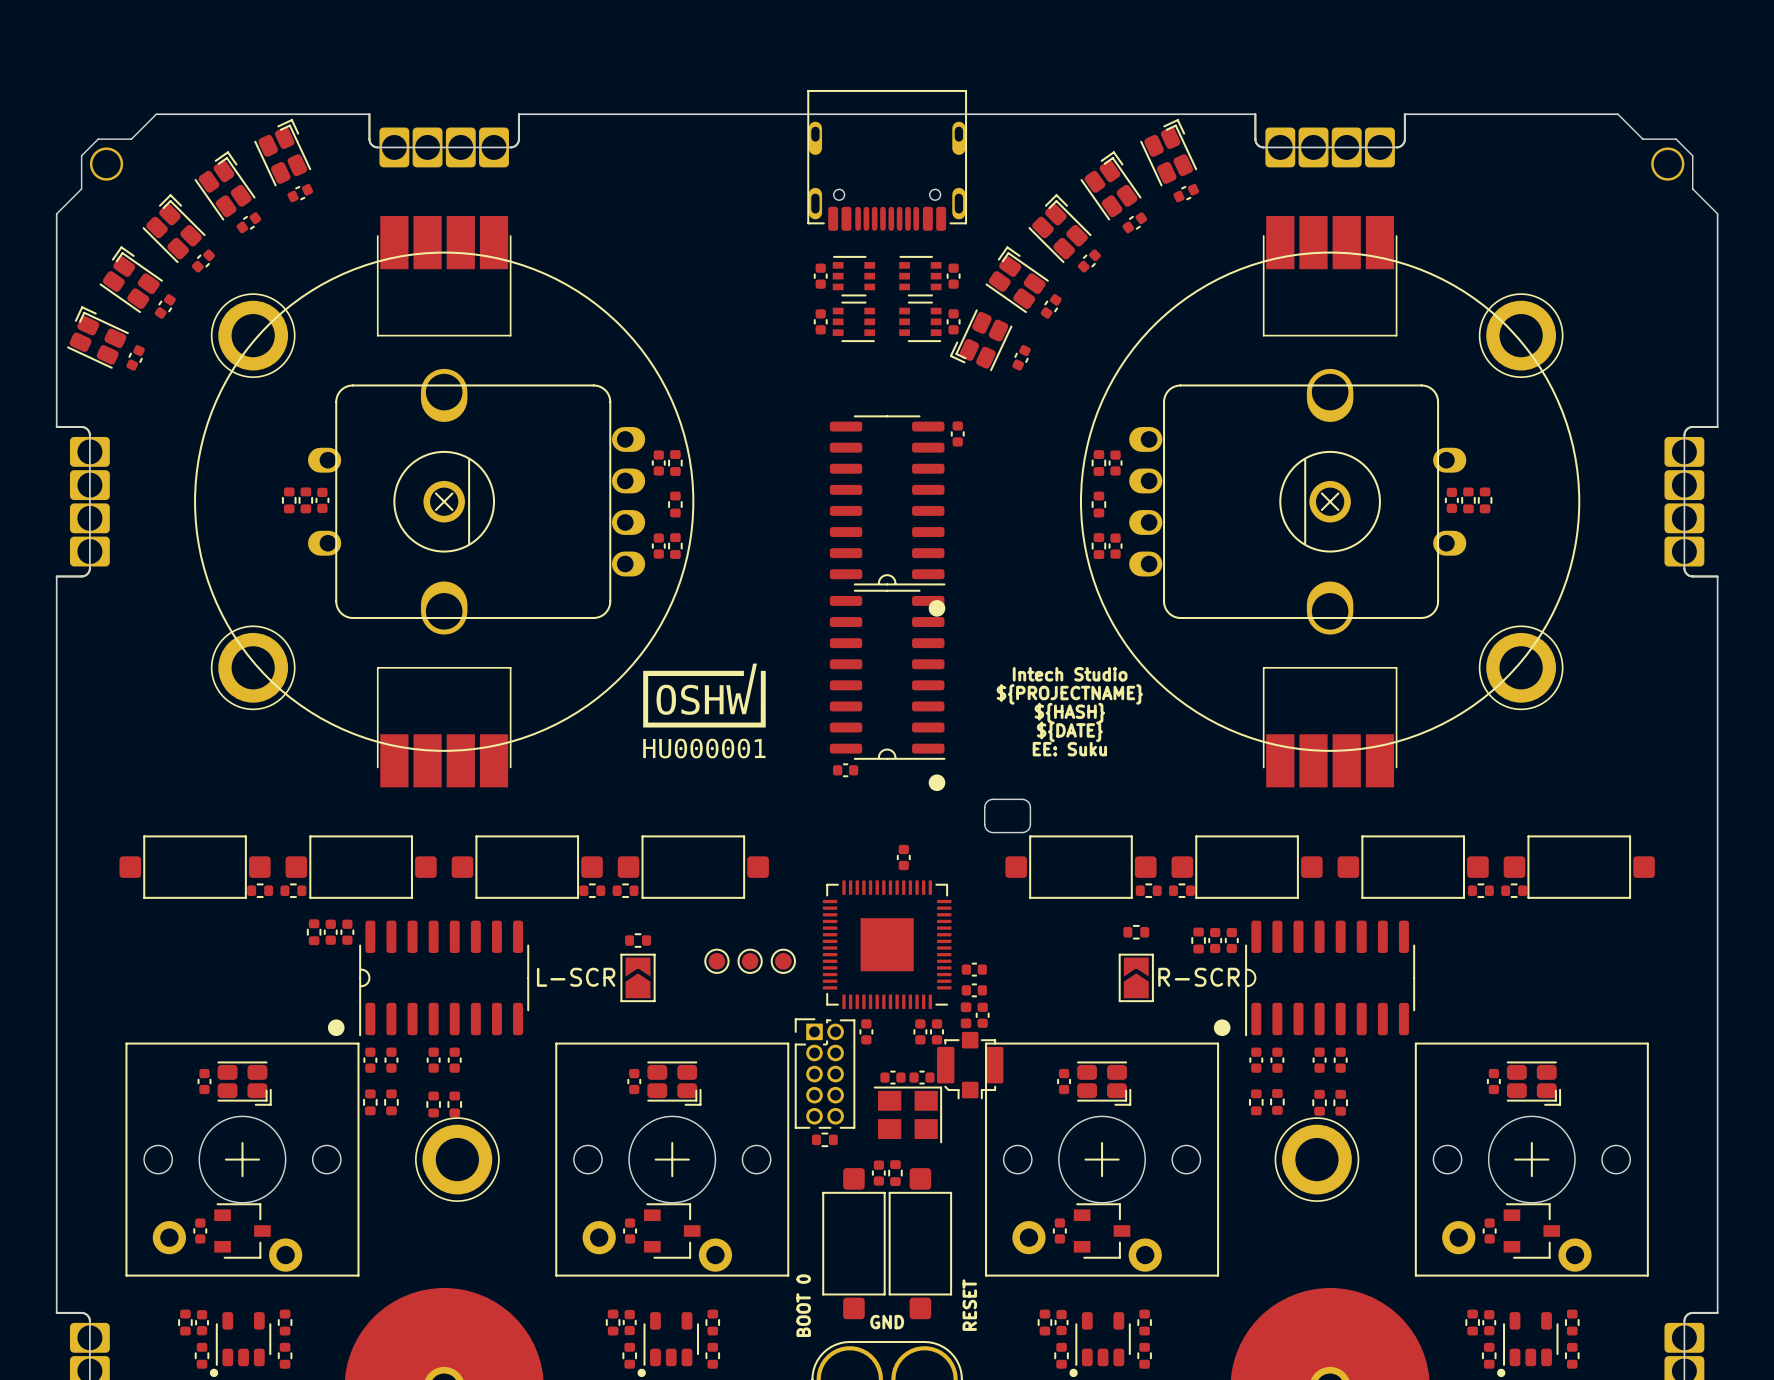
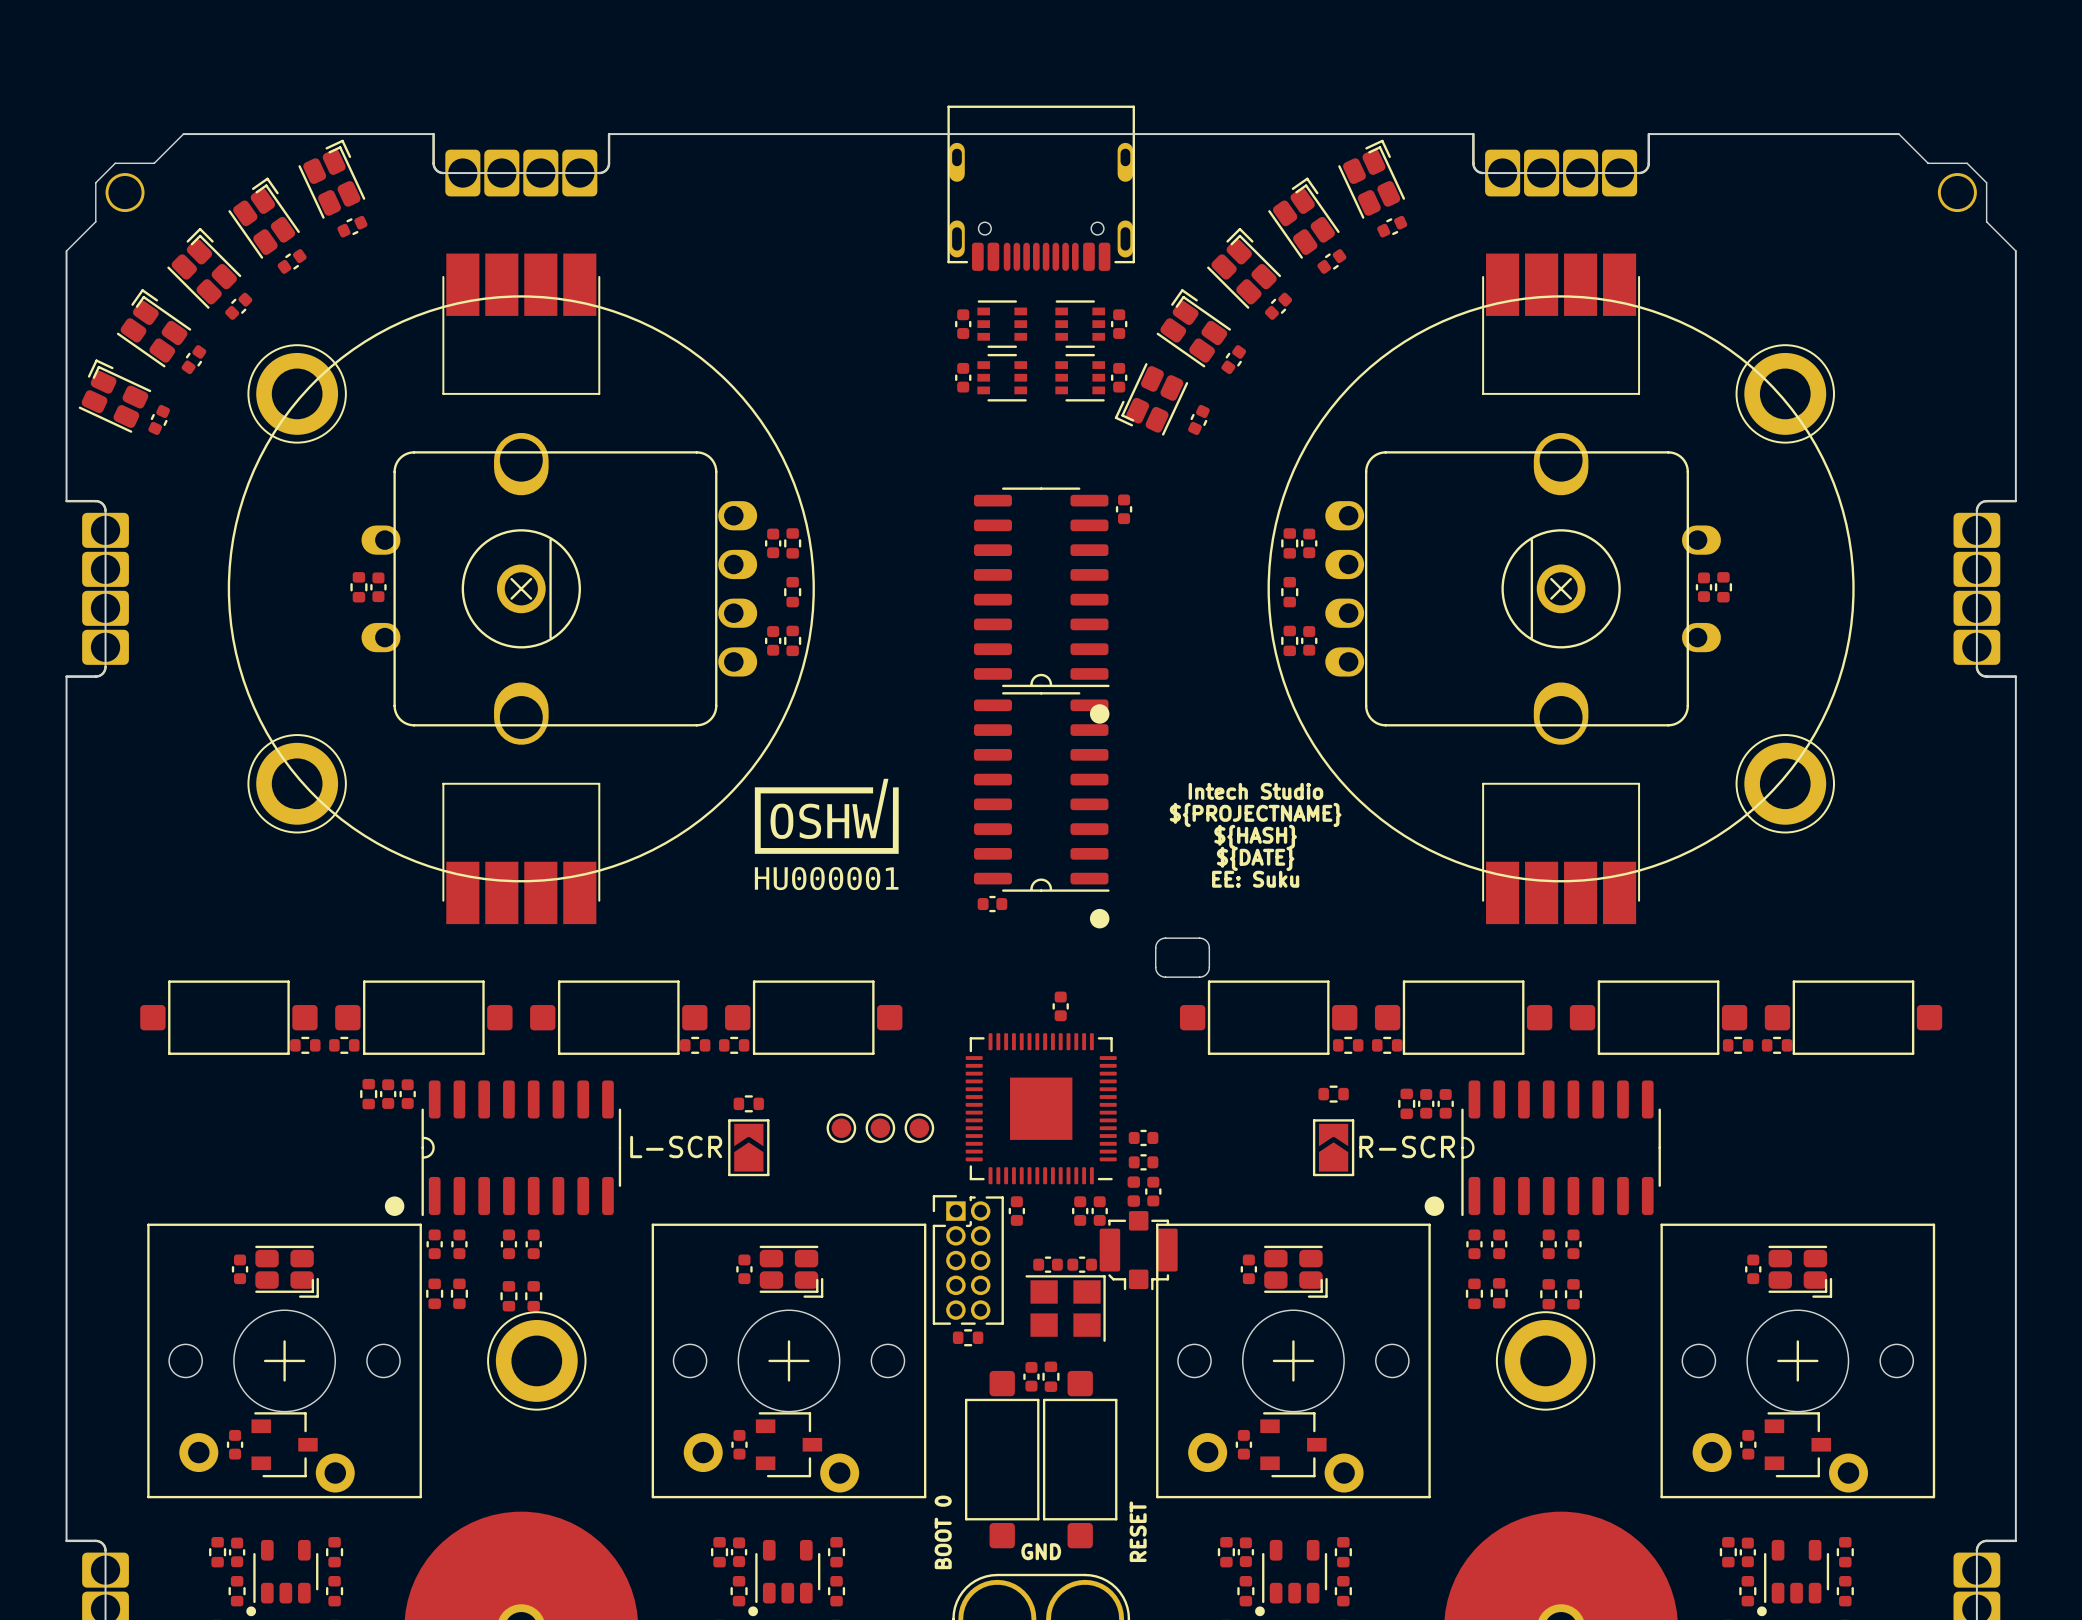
part: (289, 500) -> none
part: (1485, 500) -> none

